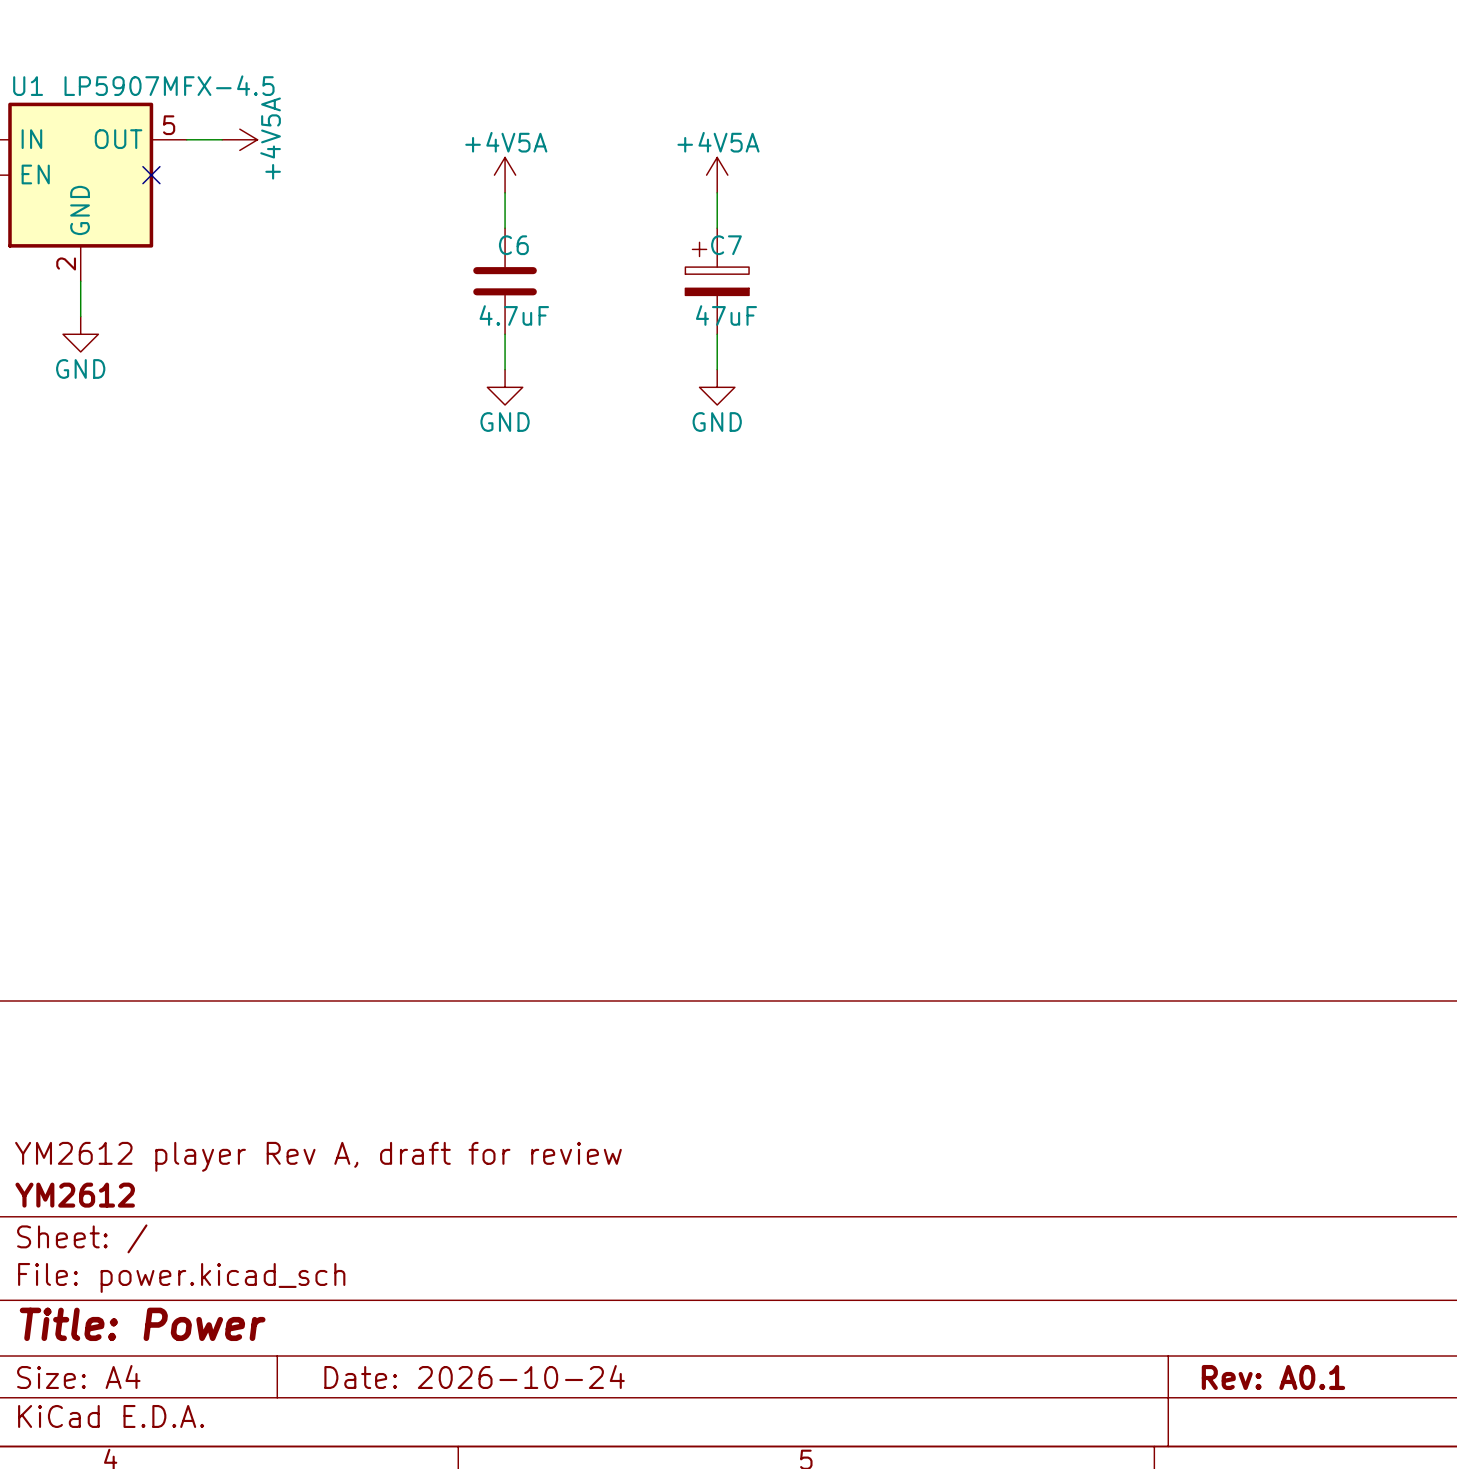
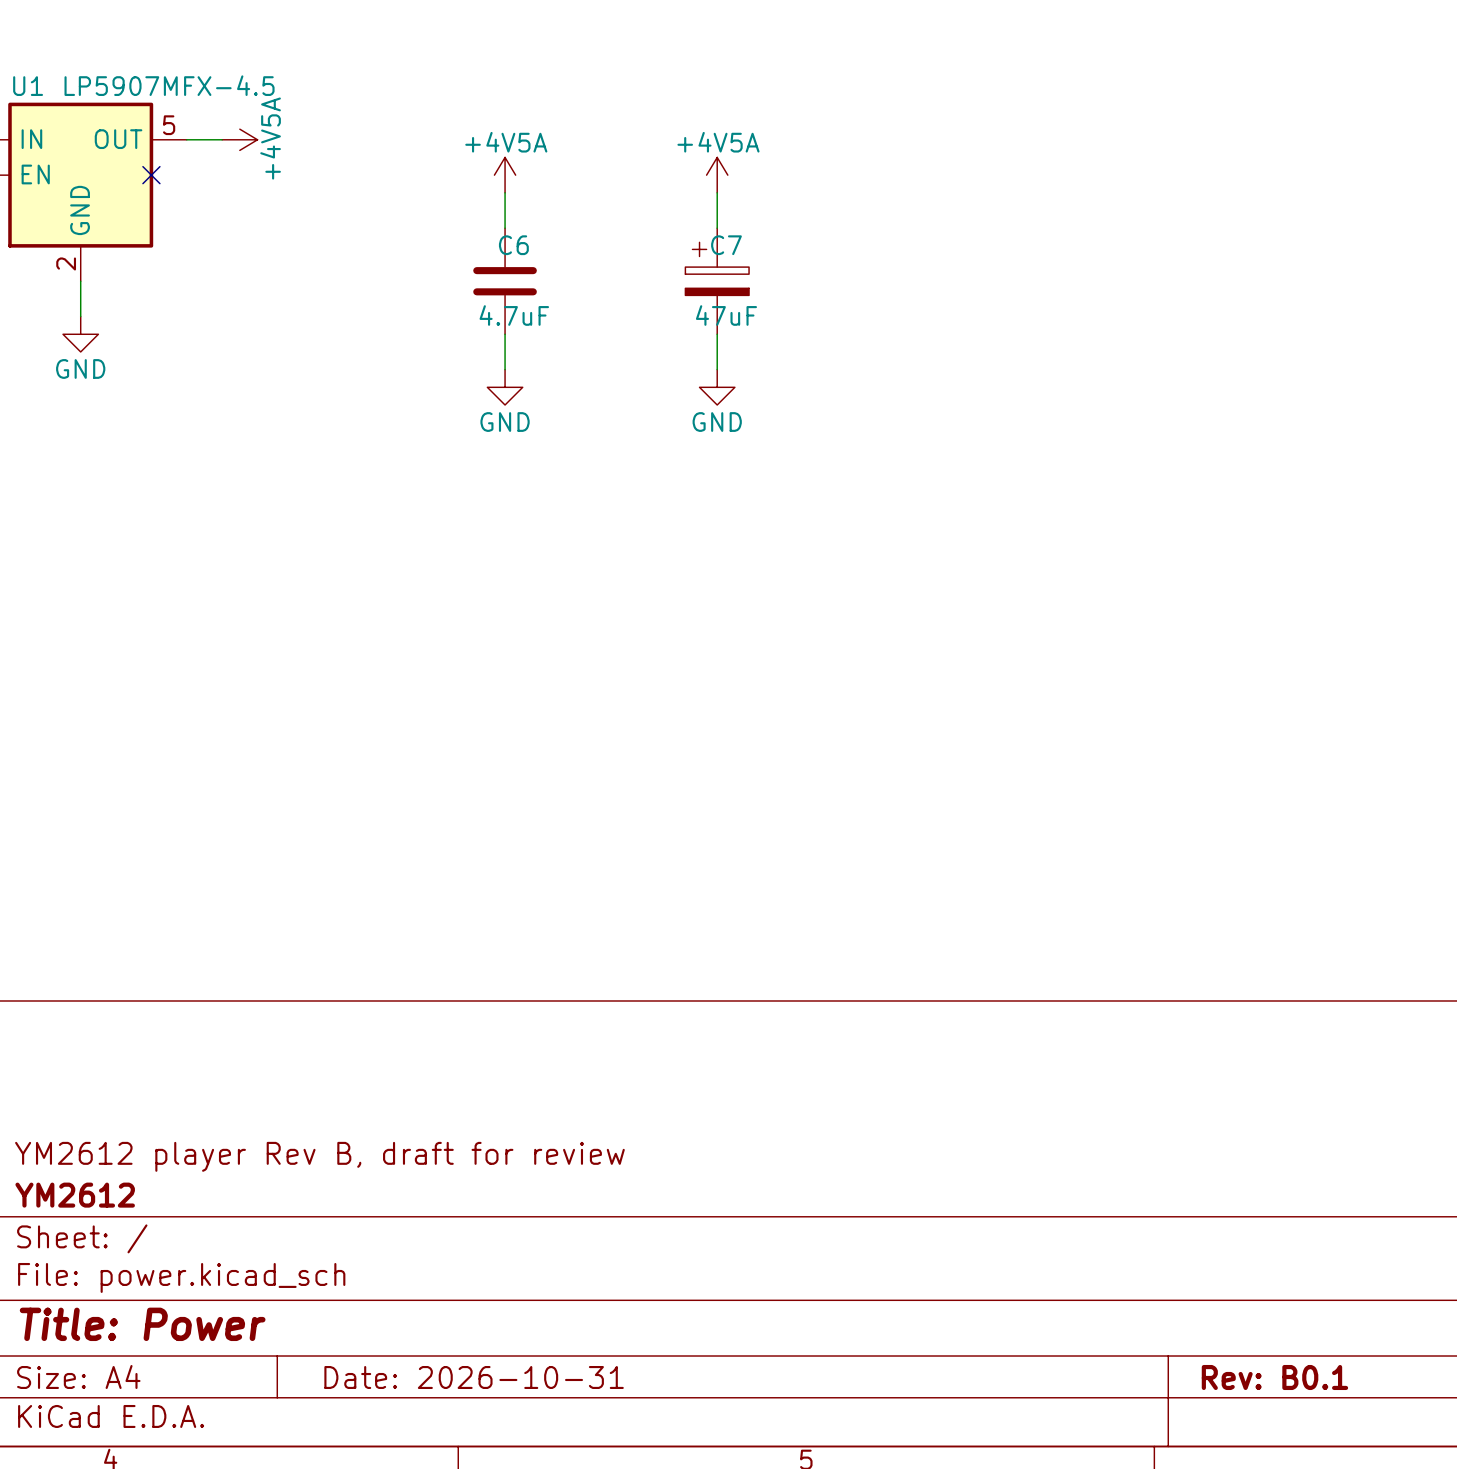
title block: YM2612 player Rev A, draft for review (318, 1156) -> YM2612 player Rev B, draft for review (319, 1156)
title block: Date: 2026-10-24 (474, 1377) -> Date: 2026-10-31 (474, 1377)
title block: Rev: A0.1 (1273, 1377) -> Rev: B0.1 (1274, 1377)

